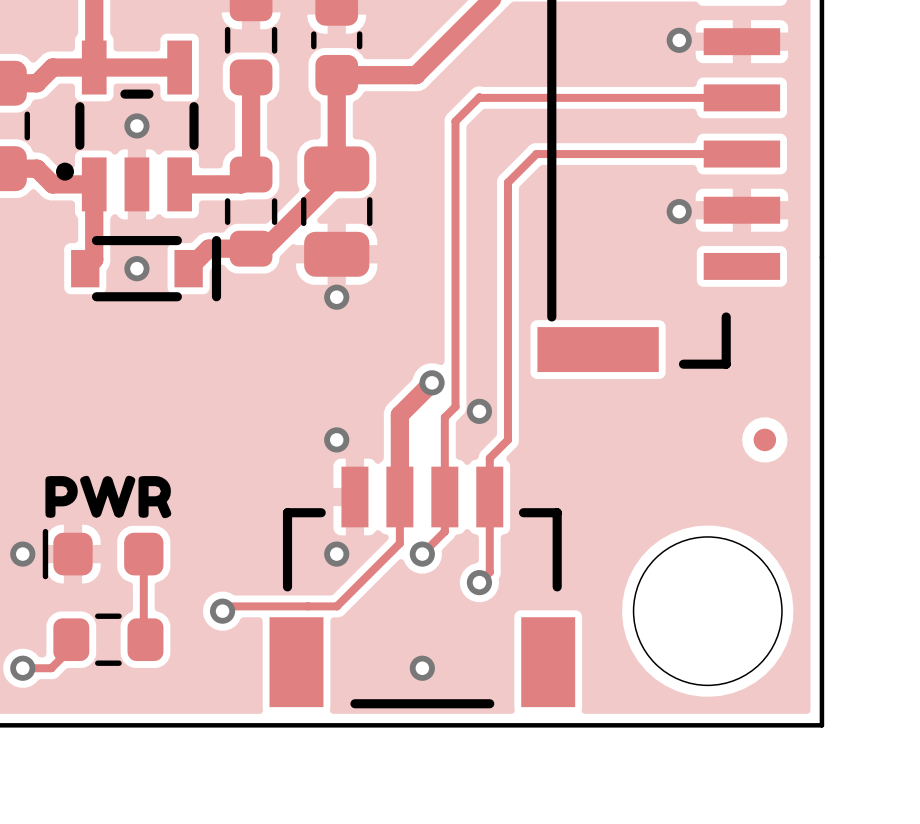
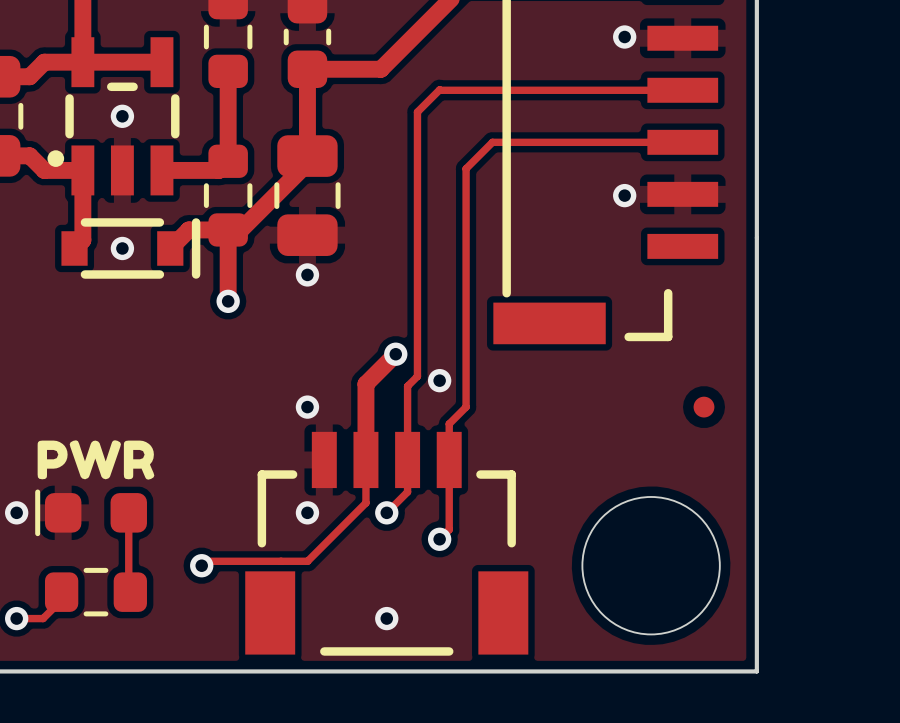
track: none -> (228, 229) (228, 301)
via: none -> (228, 301)

